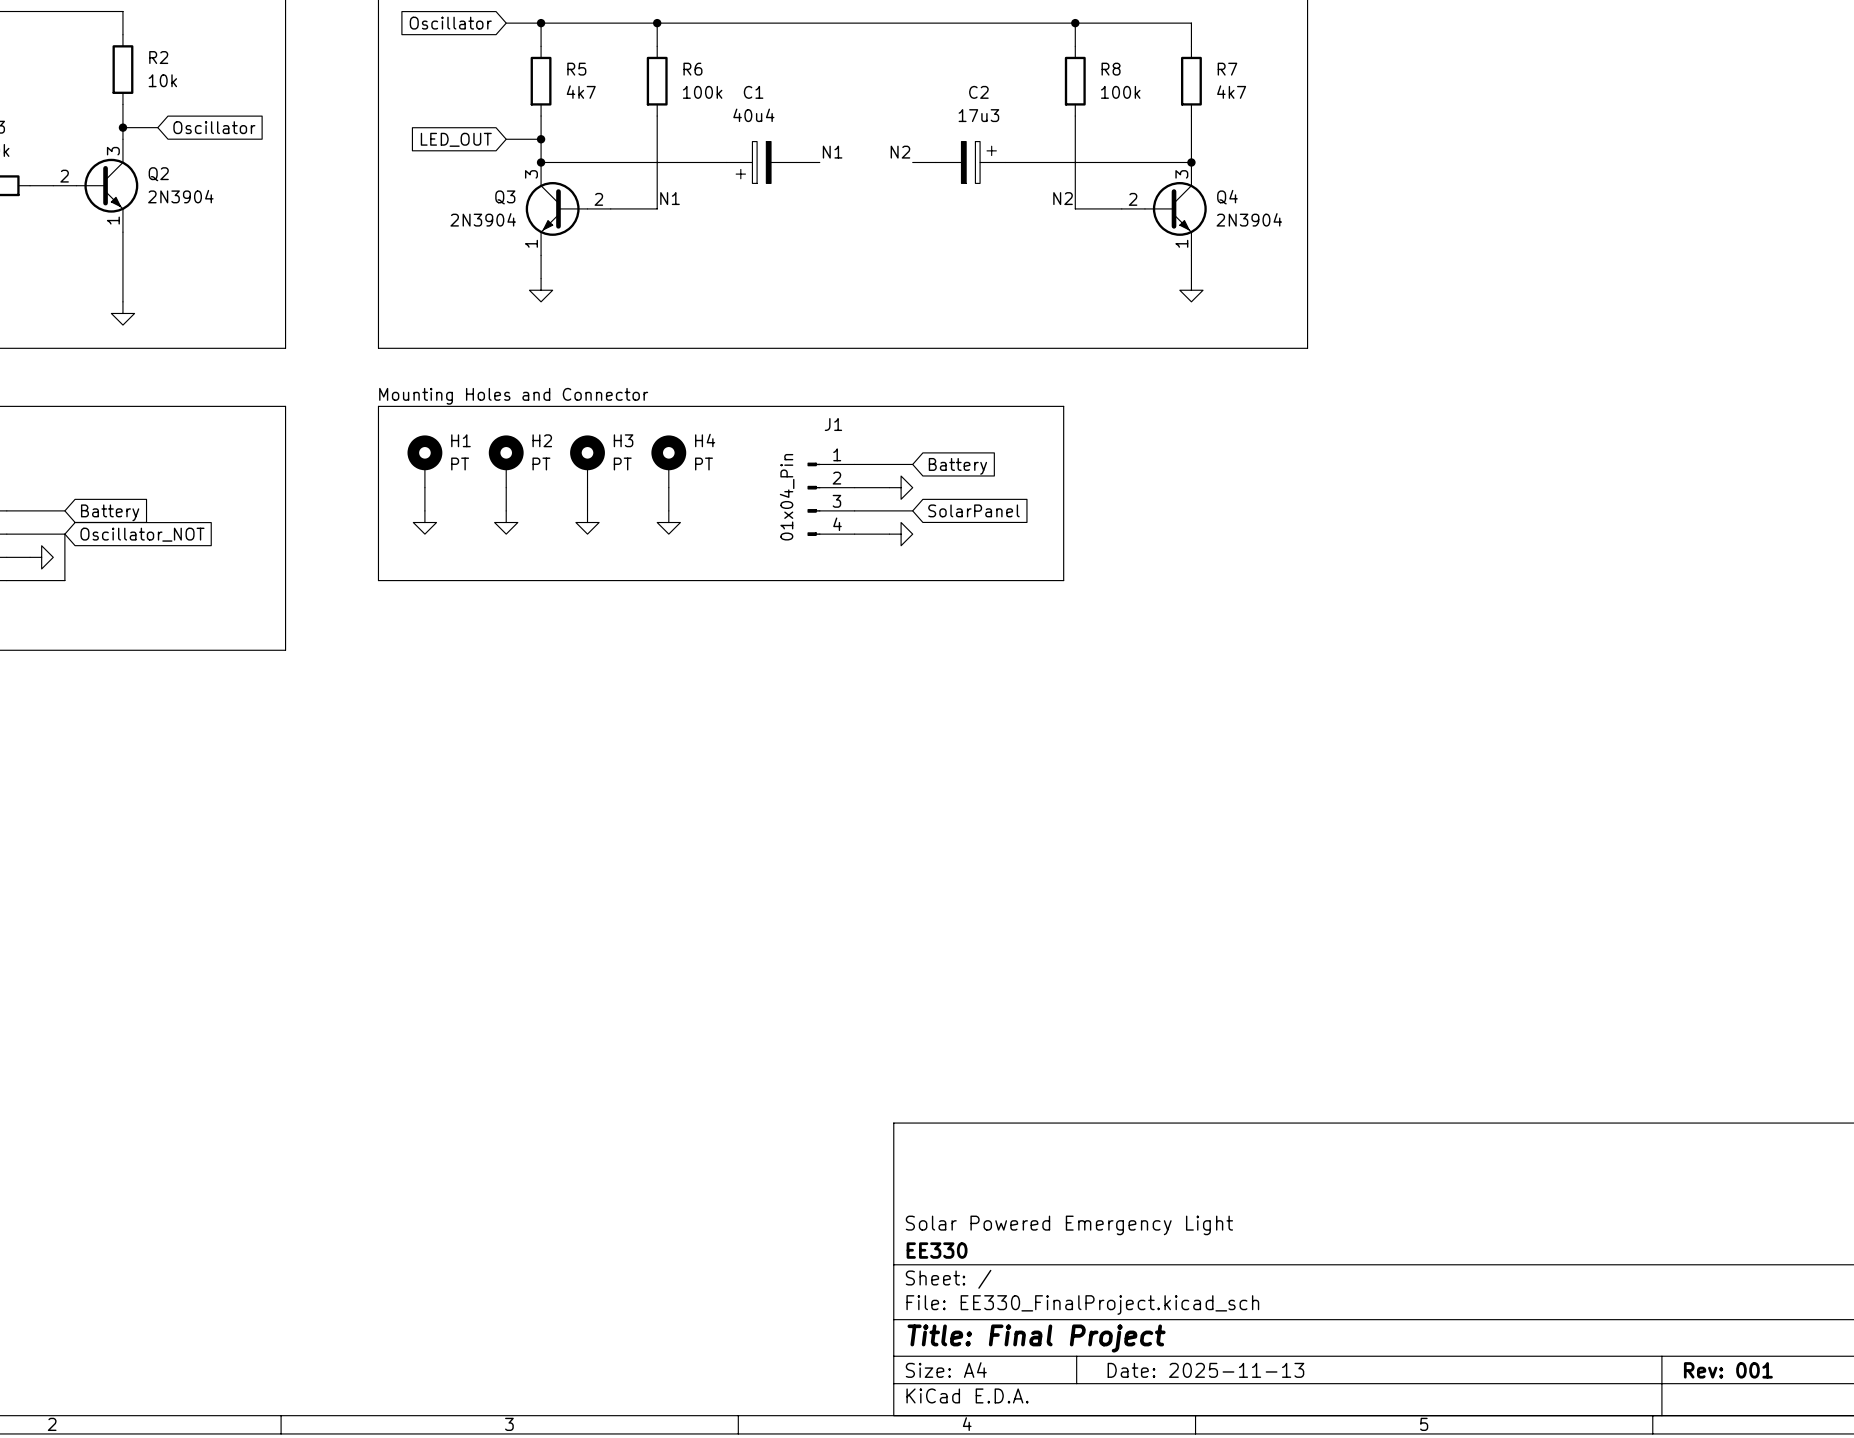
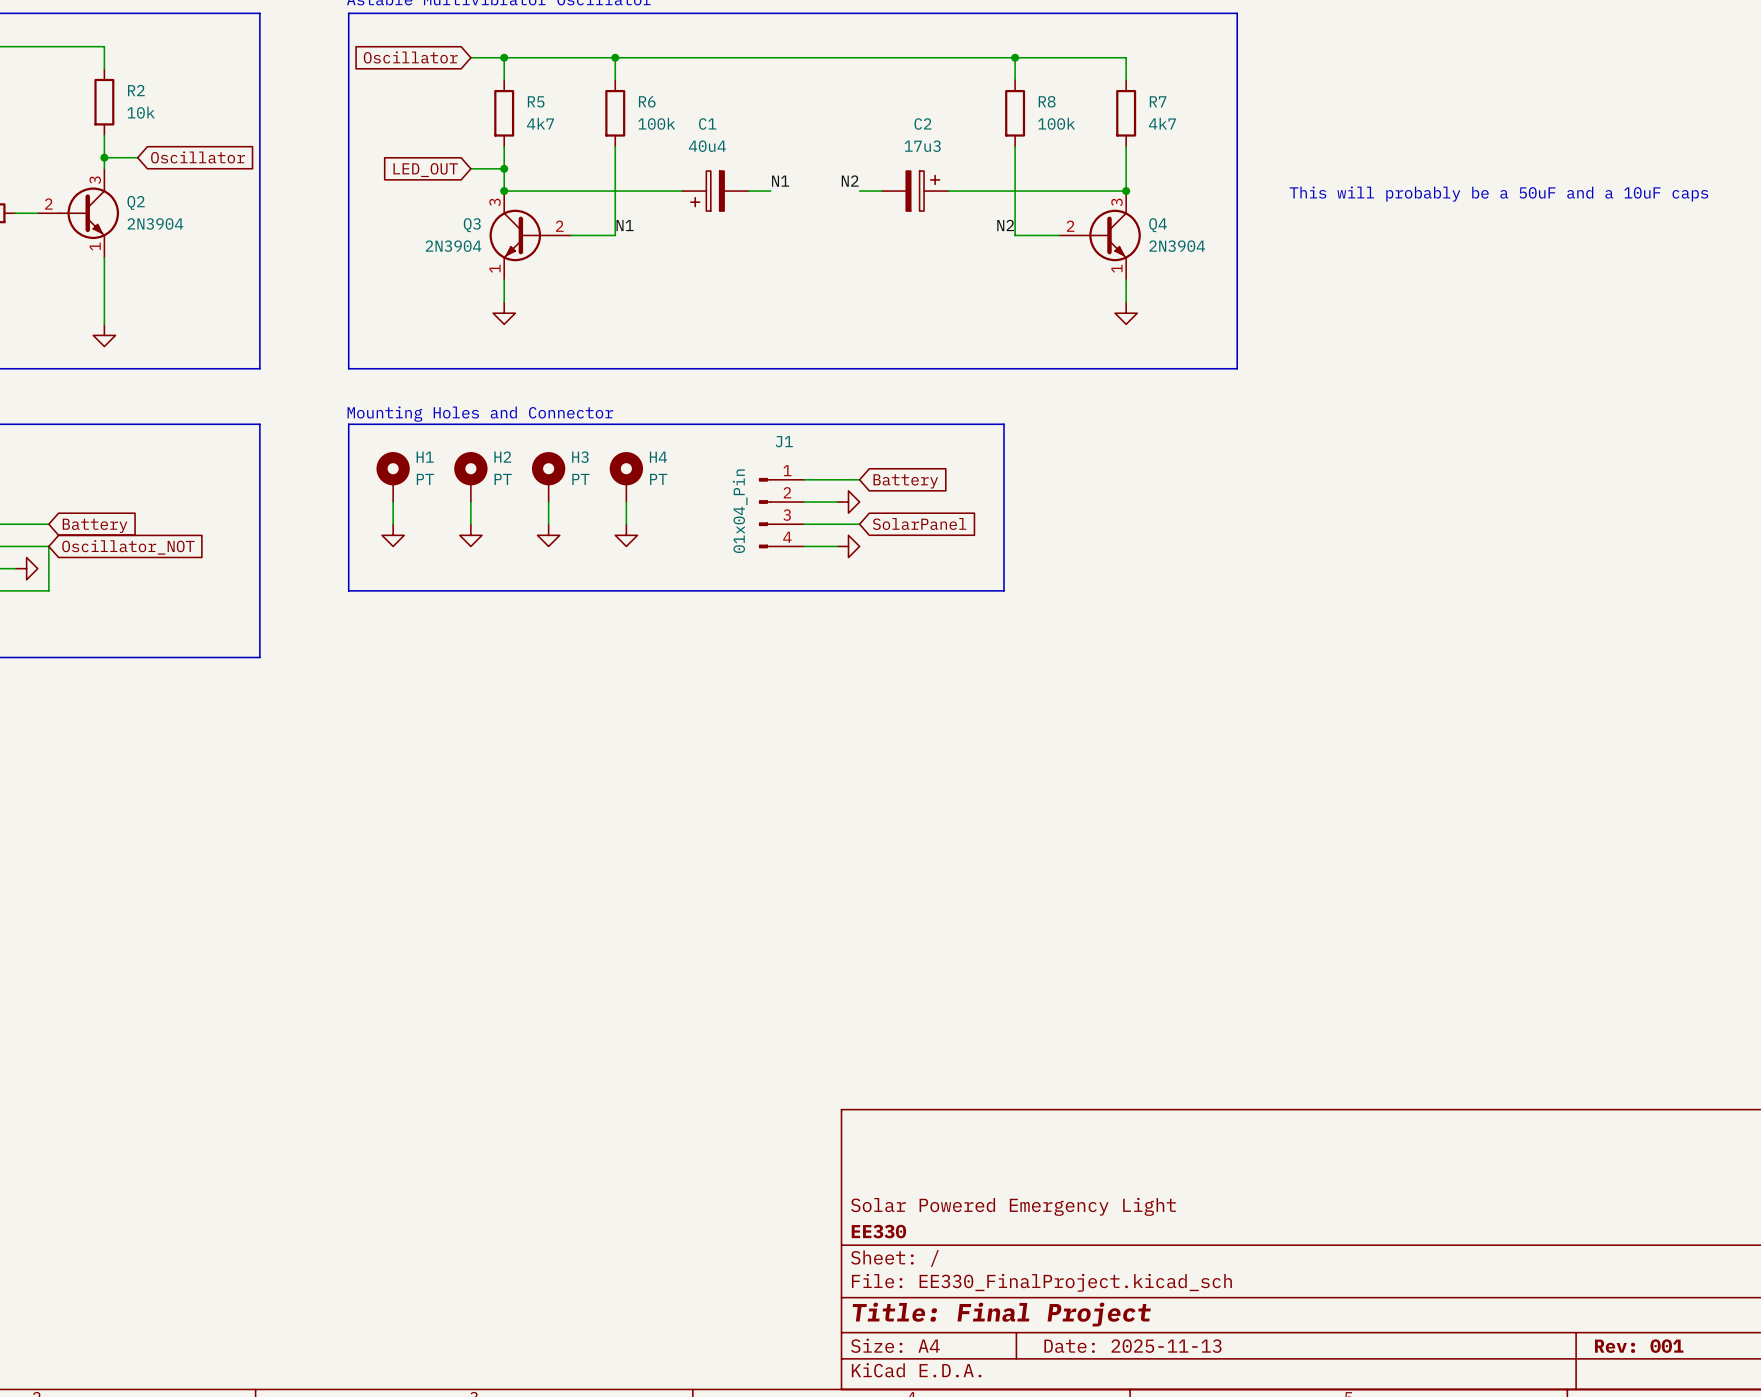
text: none -> This will probably be a 50uF and a 10uF caps (1498, 194)

